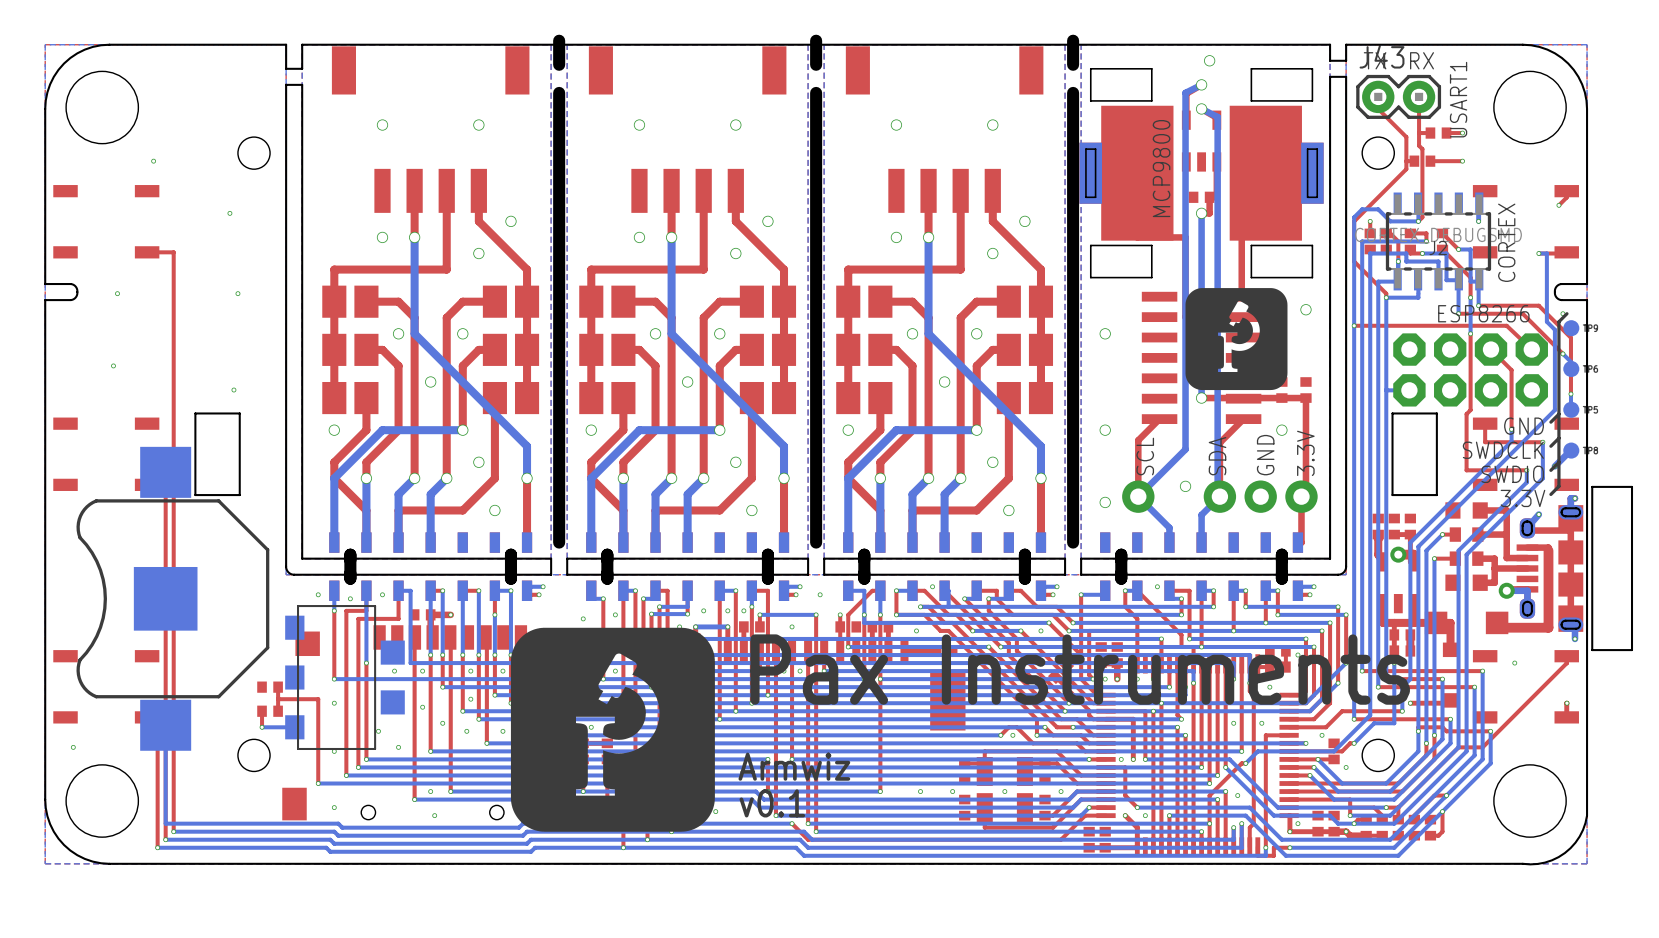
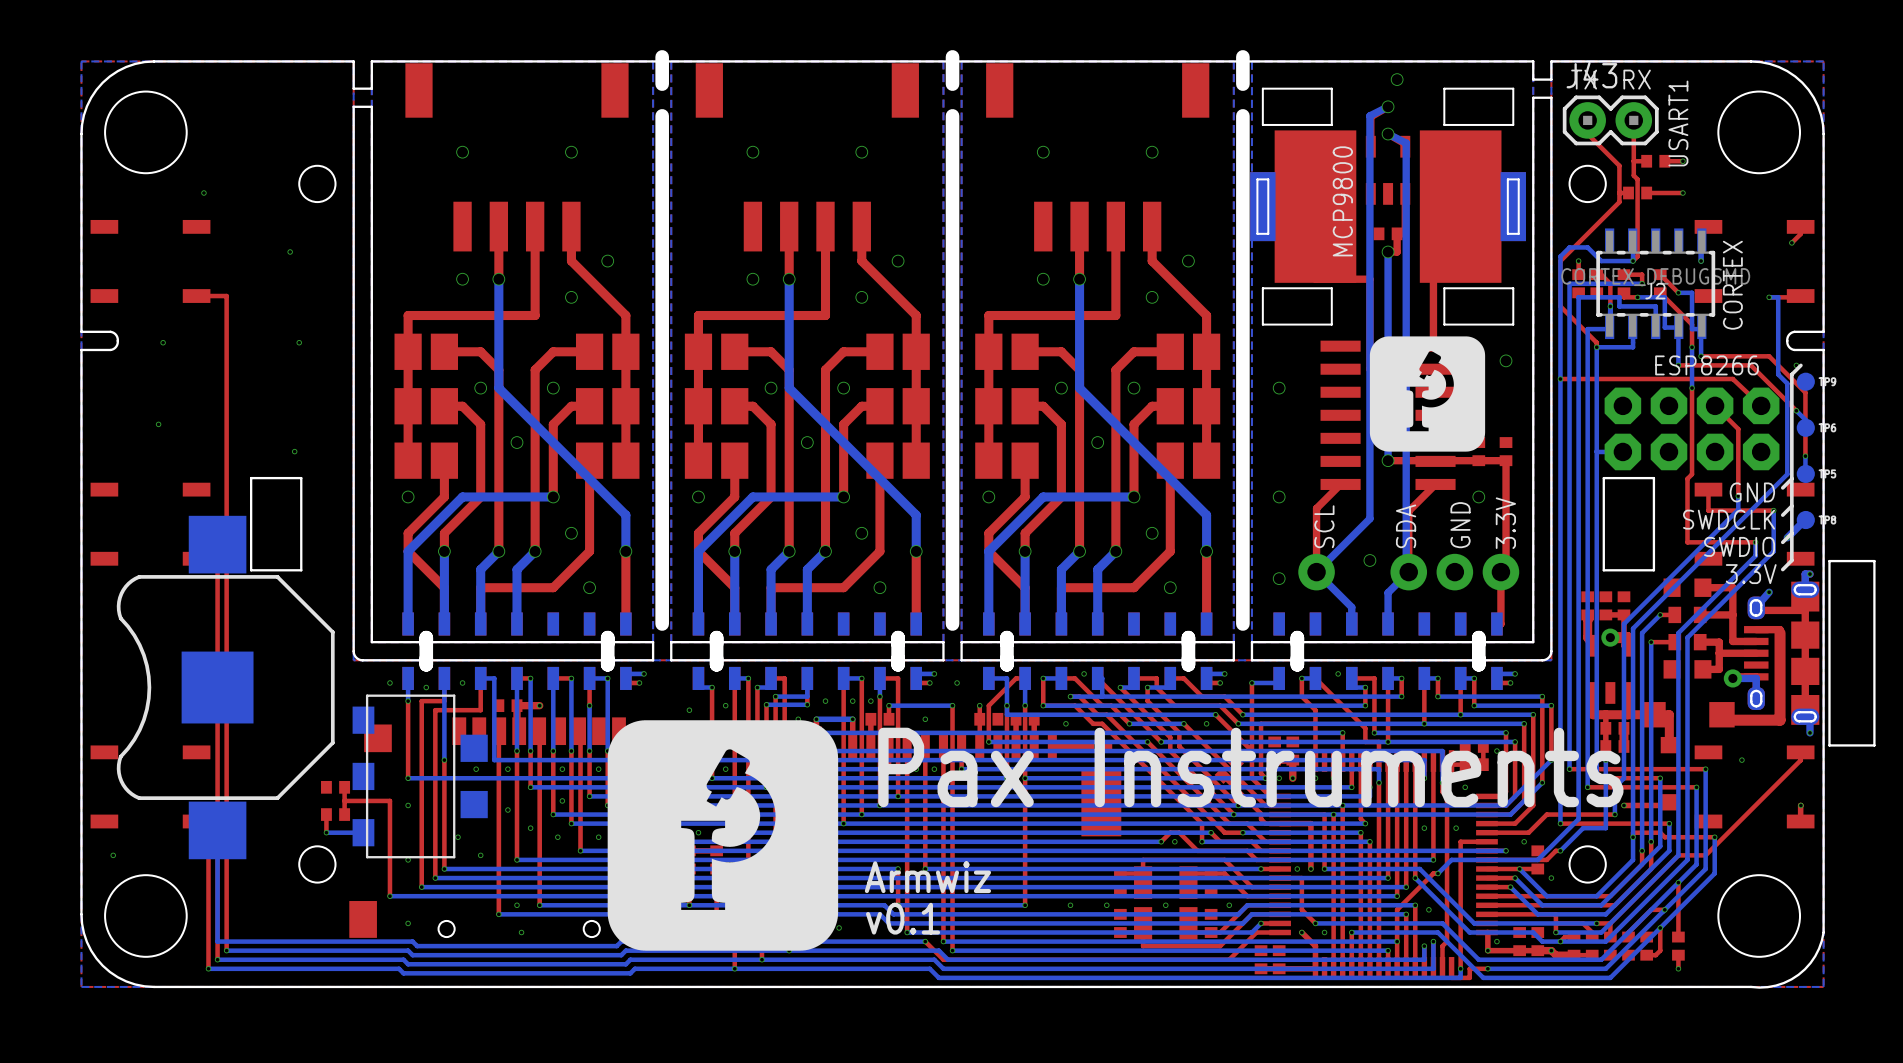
top track: none -> (1678, 882) (1678, 937)
via: none -> (1678, 882)
part: none -> (1678, 946)
top track: none -> (1678, 955) (1678, 968)
via: none -> (1678, 968)

